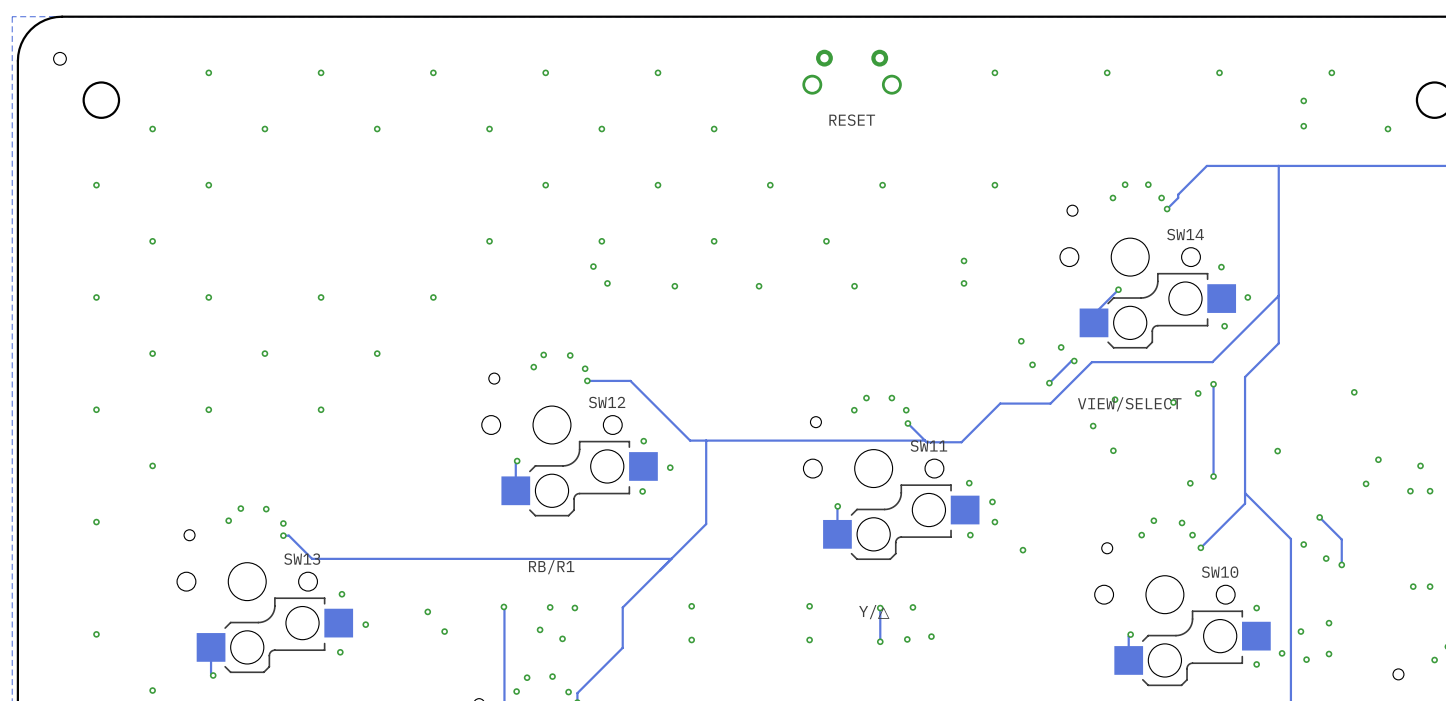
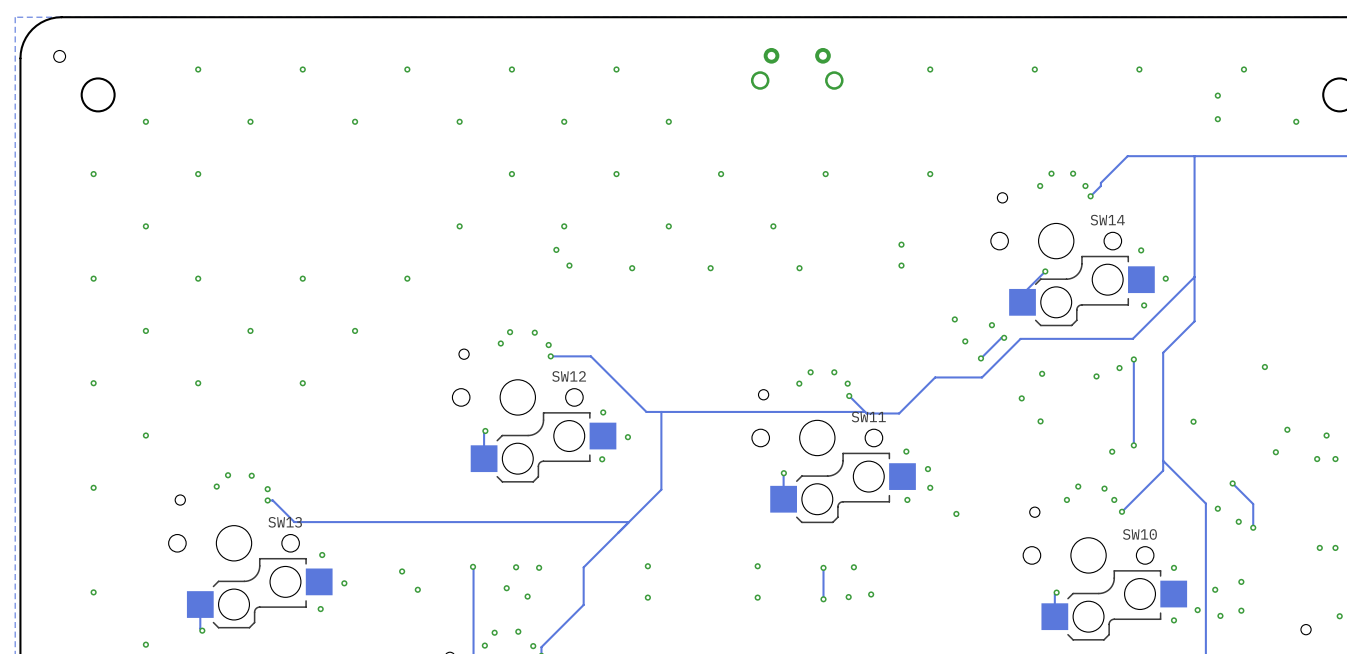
text: RESET (852, 120) -> none
text: VIEW/SELECT (1129, 404) -> none
text: RB/R1 (551, 567) -> none
text: Y/△ (874, 612) -> none

